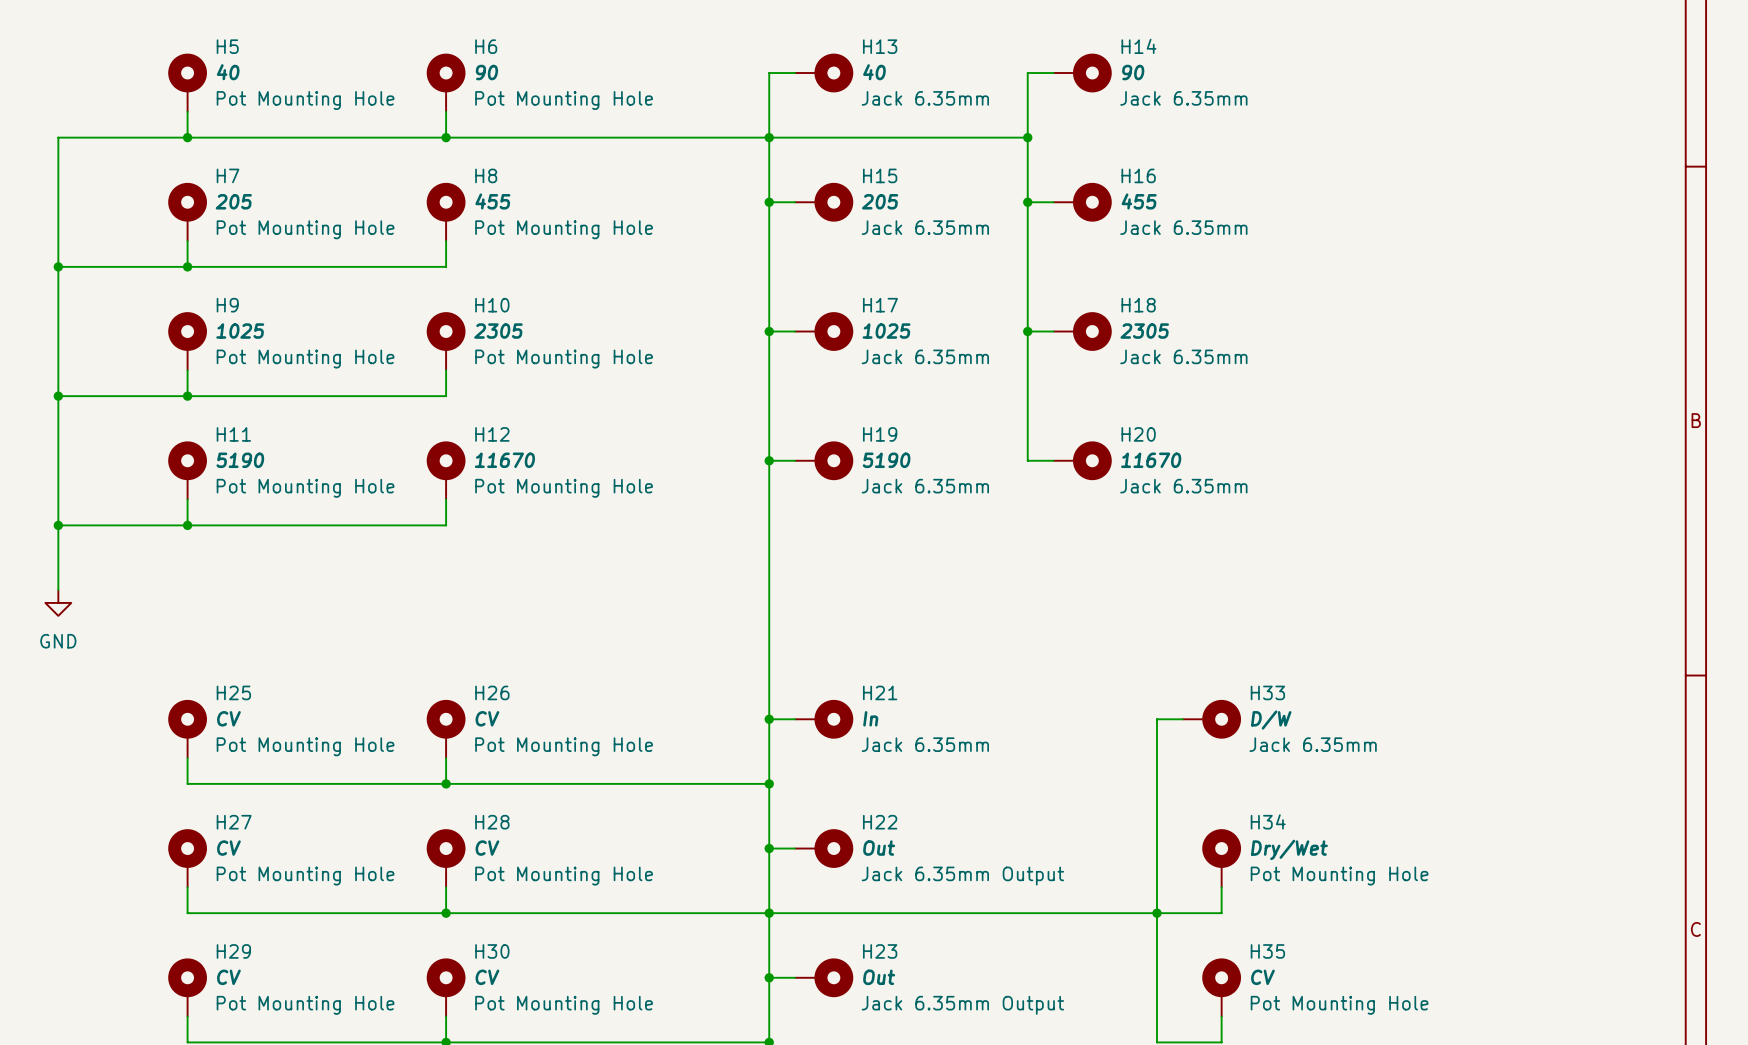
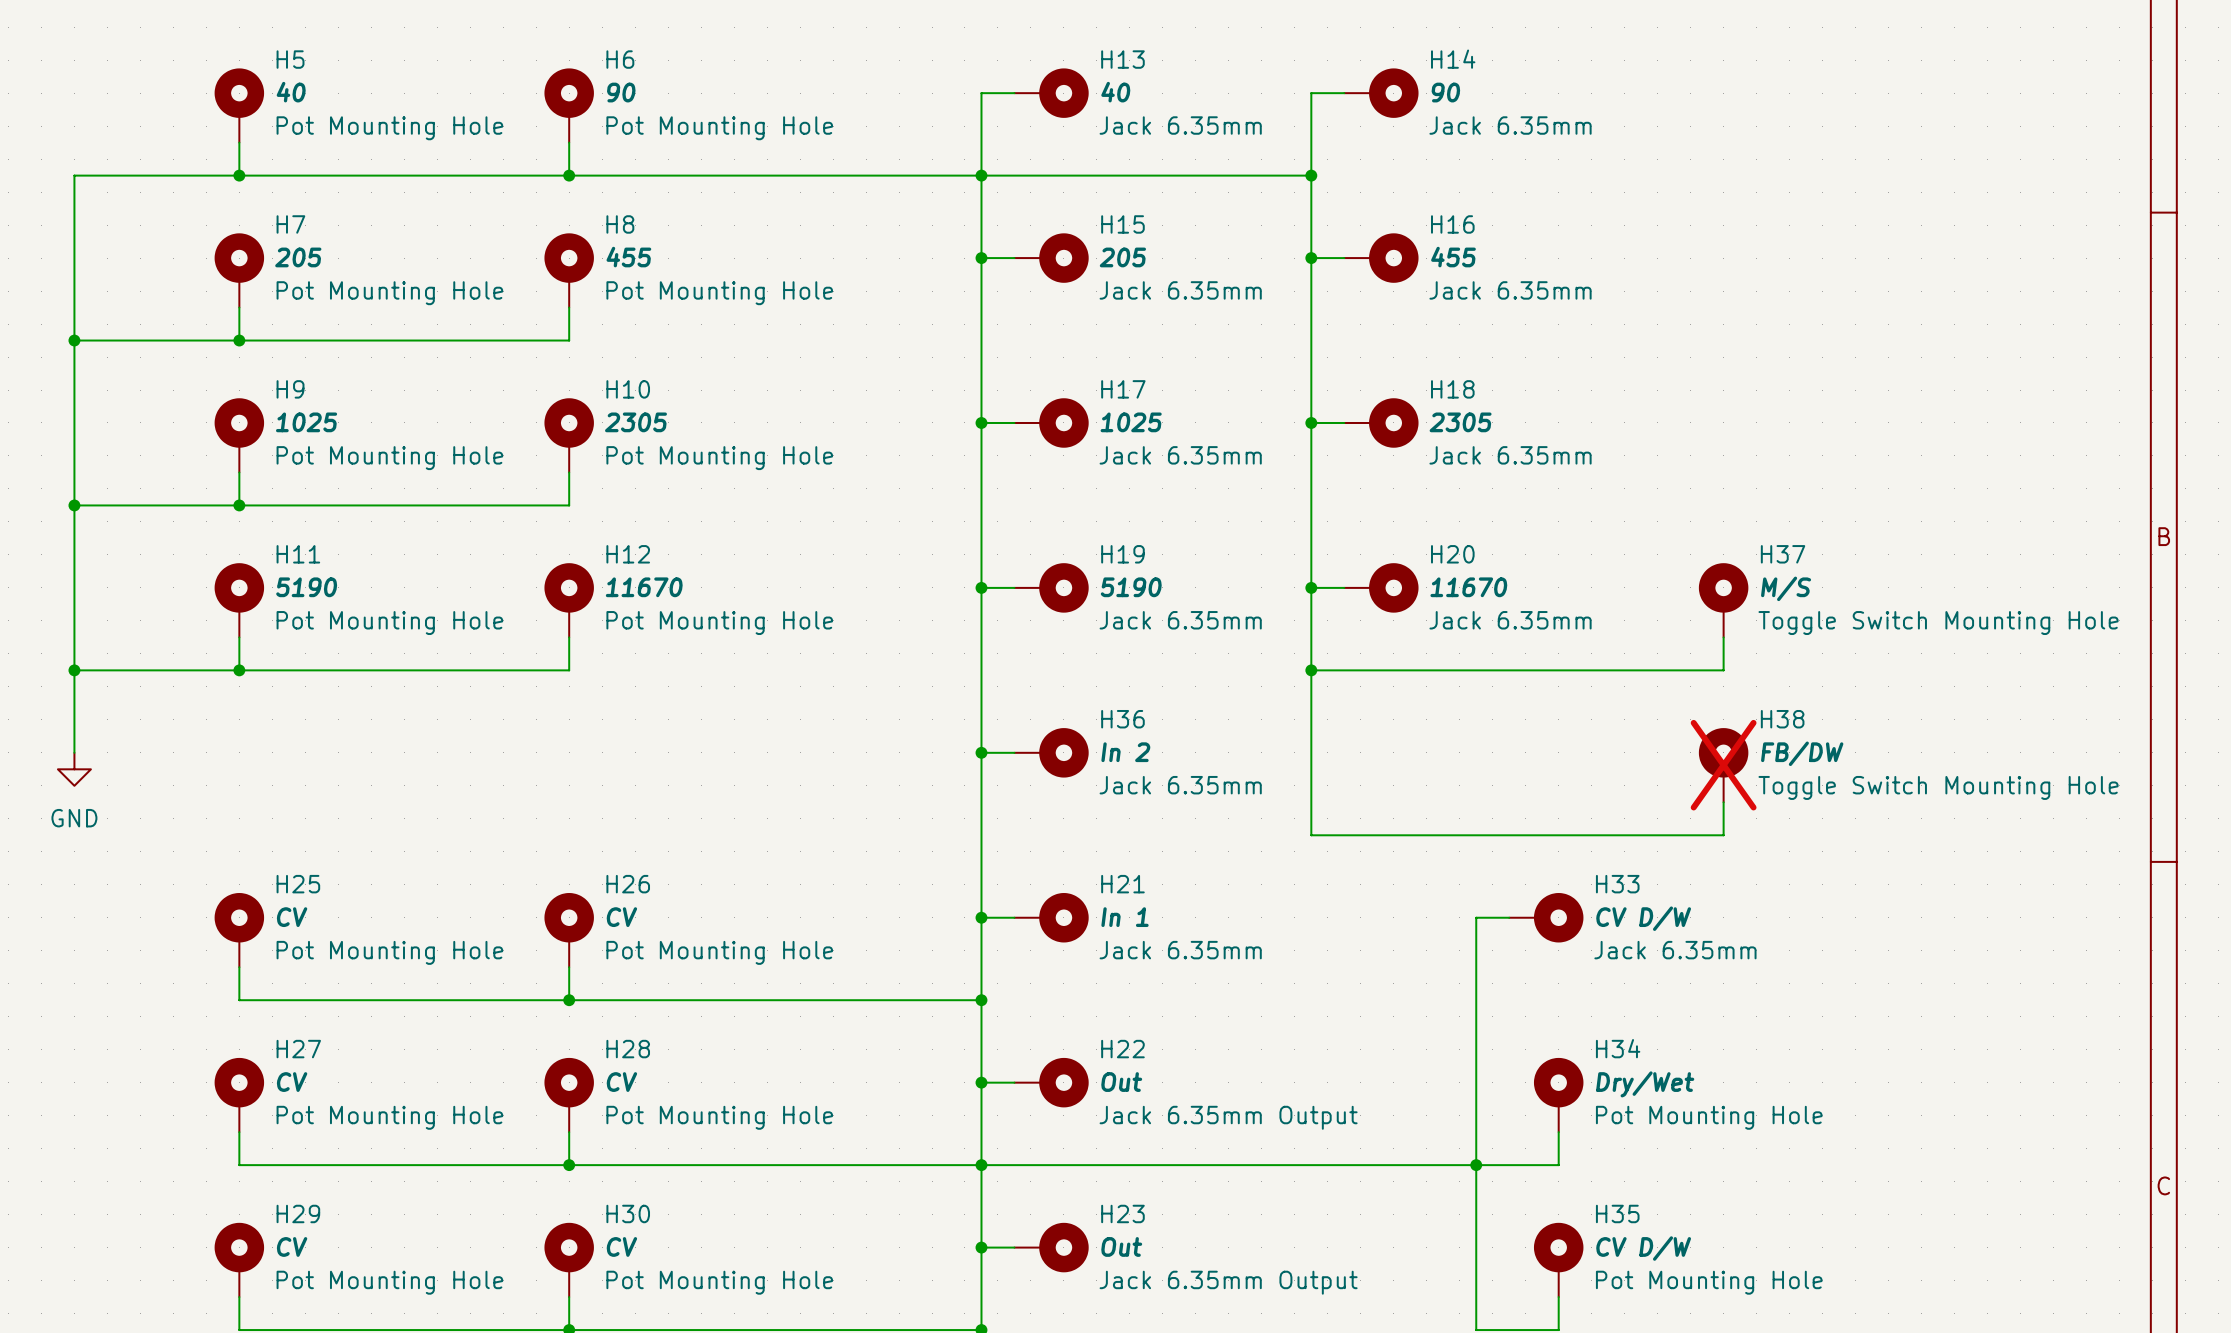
wire: none -> (1311, 587) (1311, 835) (1723, 835) (1723, 802)
junction: none -> (1311, 587)
H37: none -> M/S (1723, 600)
wire: none -> (1723, 637) (1723, 670) (1311, 670)
junction: none -> (1311, 670)
wire: none -> (981, 752) (1014, 752)
junction: none -> (981, 752)
H36: none -> In 2 (1051, 752)
H38: none -> FB/DW (1723, 765)
H21 value: In (870, 718) -> In 1 (1125, 917)
H33 value: D/W (1271, 720) -> CV D/W (1643, 918)
H35 value: CV (1262, 977) -> CV D/W (1643, 1248)

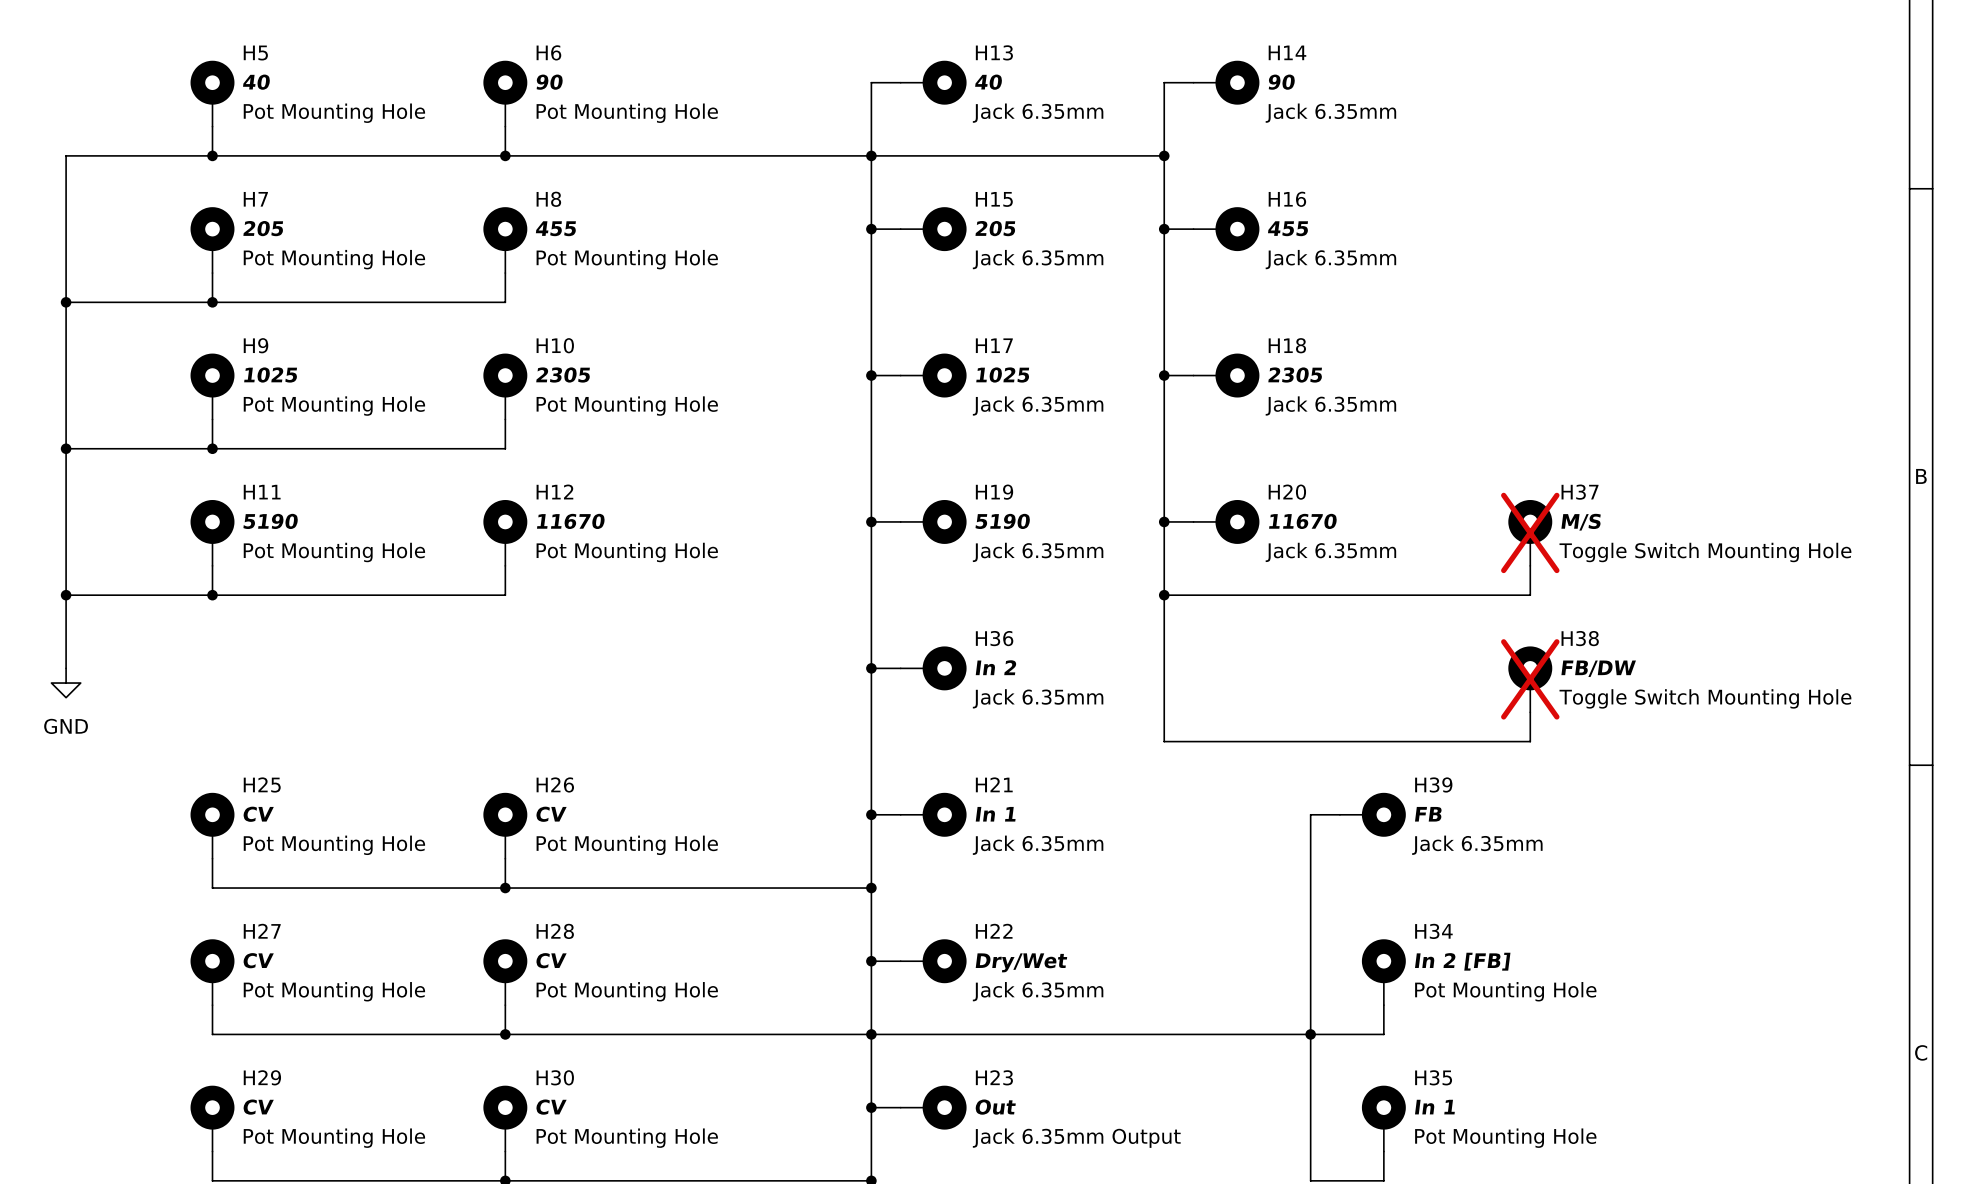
H37 do-not-place cross: none -> (1530, 532)
H33 name: H33 (1617, 884) -> H39 (1433, 784)
H33 value: CV D/W (1643, 918) -> FB (1428, 814)
H22 value: Out (1121, 1082) -> Dry/Wet (1021, 962)
H34 value: Dry/Wet (1645, 1084) -> In 2 [FB] (1462, 961)
H22 text: Jack 6.35mm Output (1228, 1117) -> Jack 6.35mm (1038, 991)
H35 value: CV D/W (1643, 1248) -> In 1 (1434, 1107)

